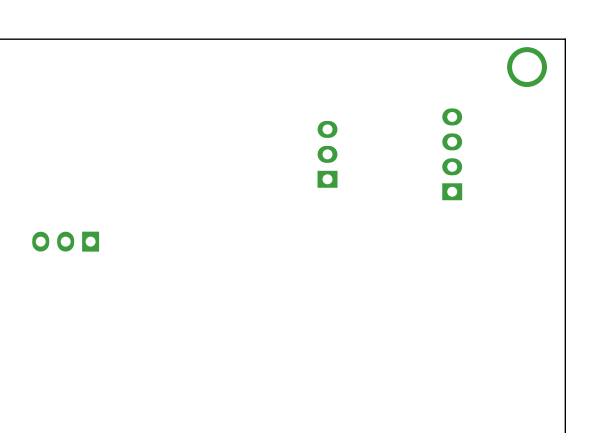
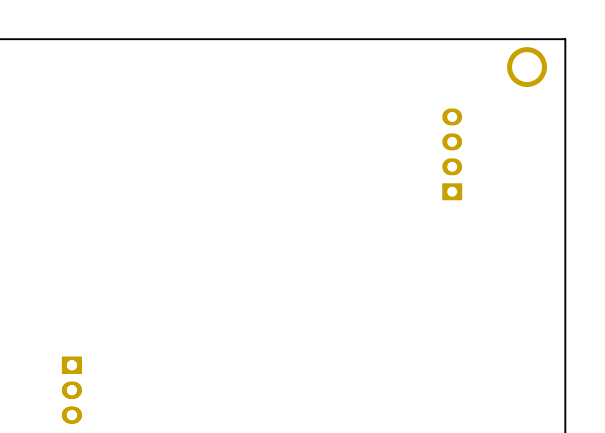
part: (327, 154) -> none
part rotation: 0° (65, 241) -> 90° counterclockwise (71, 390)
part position: (65, 241) -> (71, 390)

